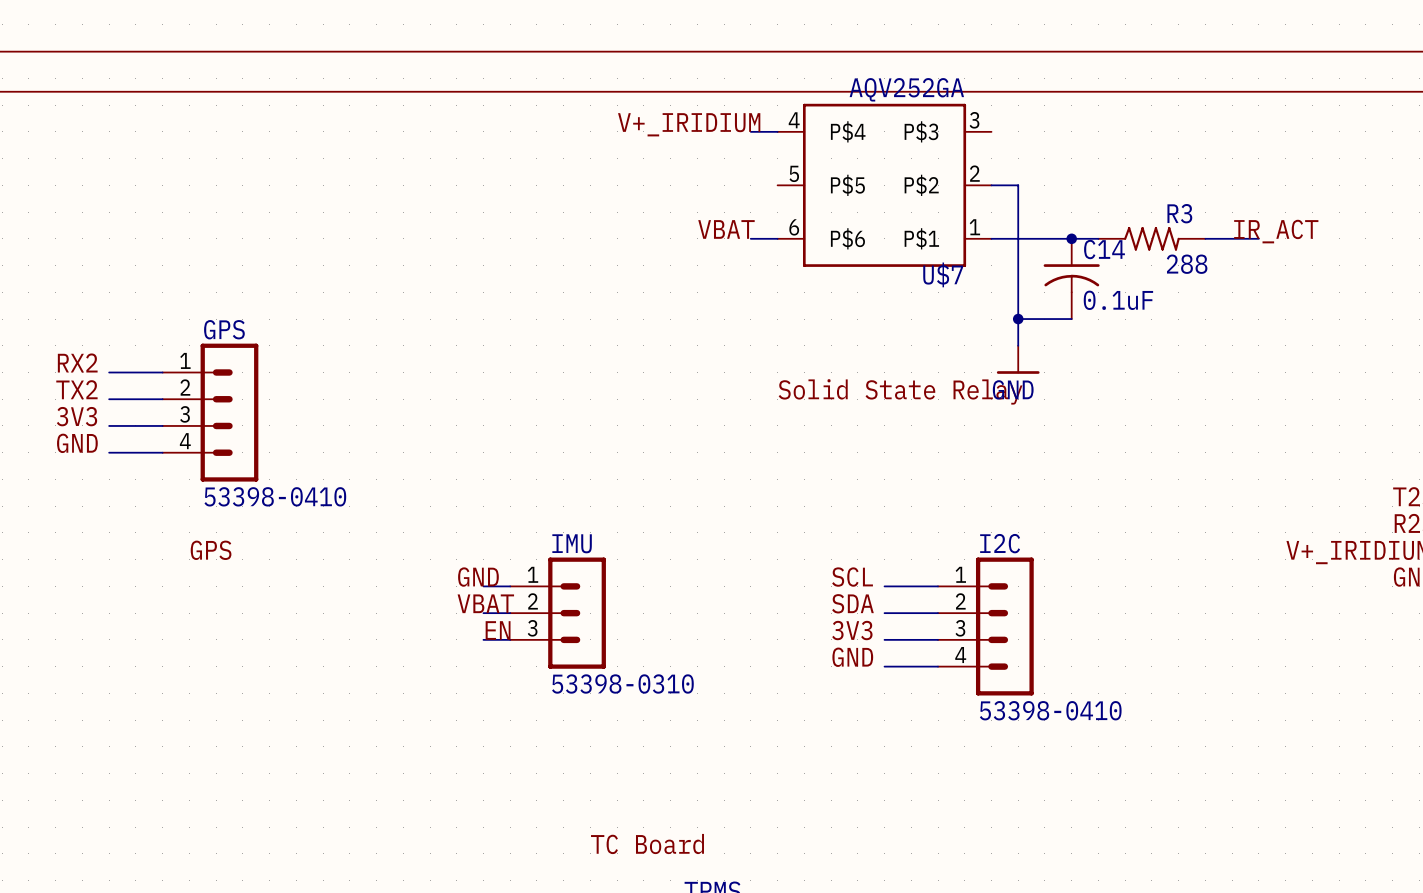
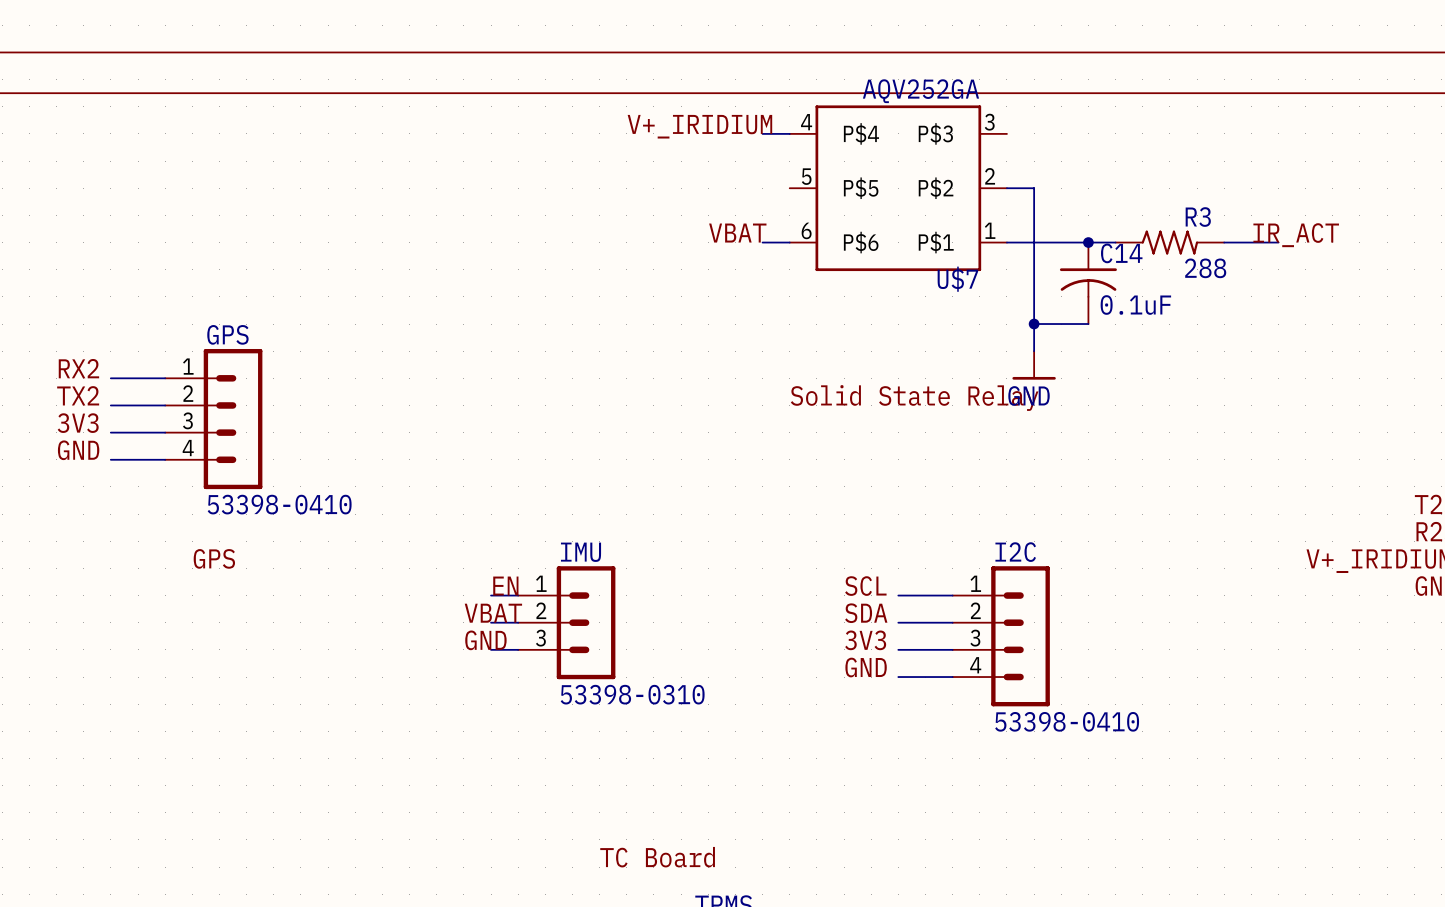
label position: GND (478, 577) -> GND (485, 640)
label position: EN (498, 630) -> EN (505, 586)

